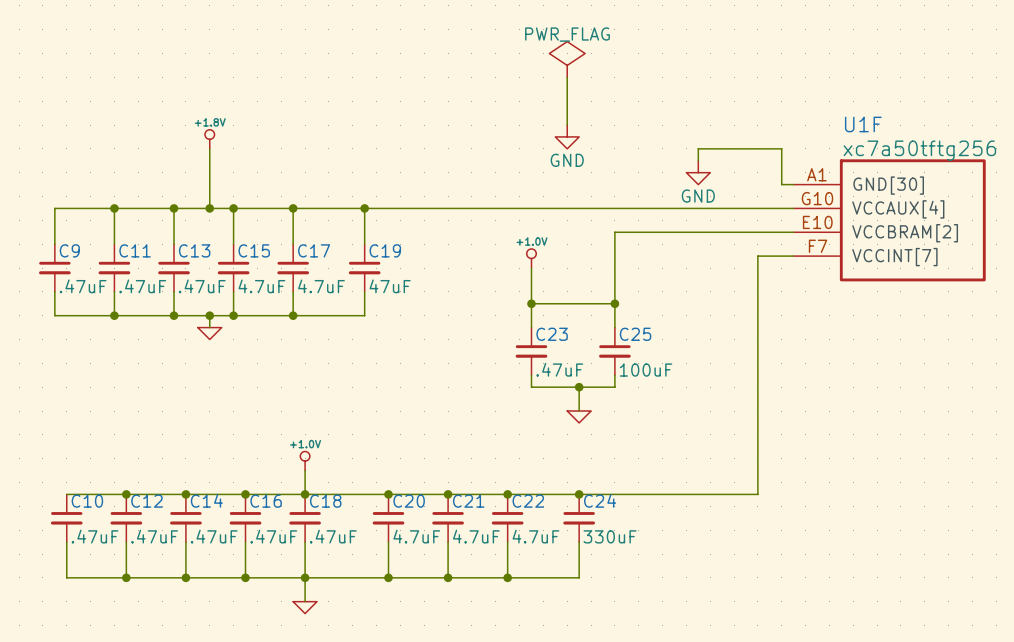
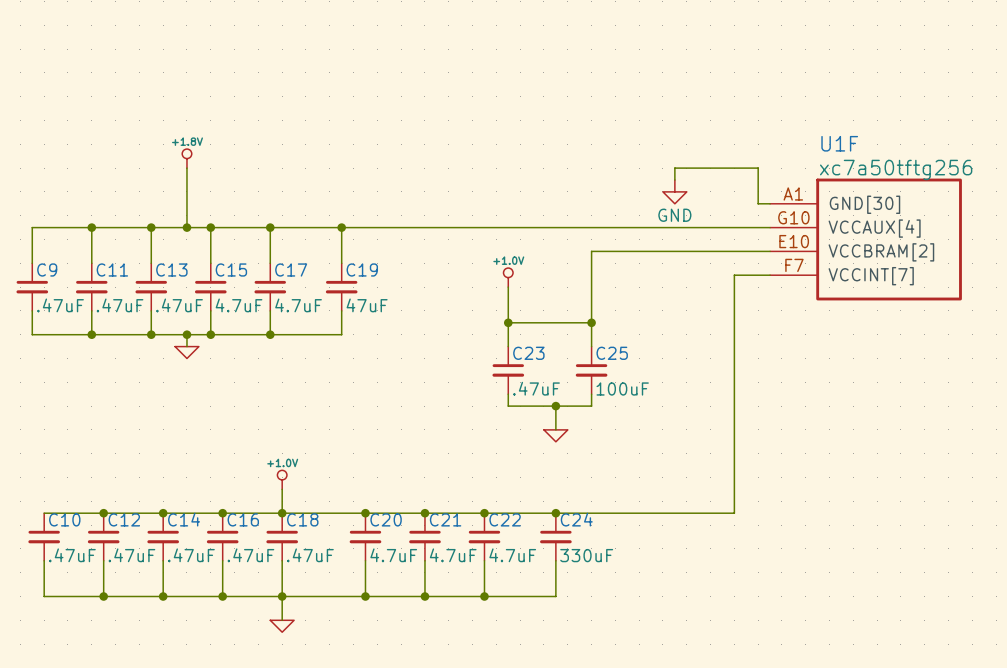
power symbol: PWR_FLAG (567, 59) -> none
wire: (567, 77) (567, 125) -> none
power symbol: GND (567, 136) -> none

